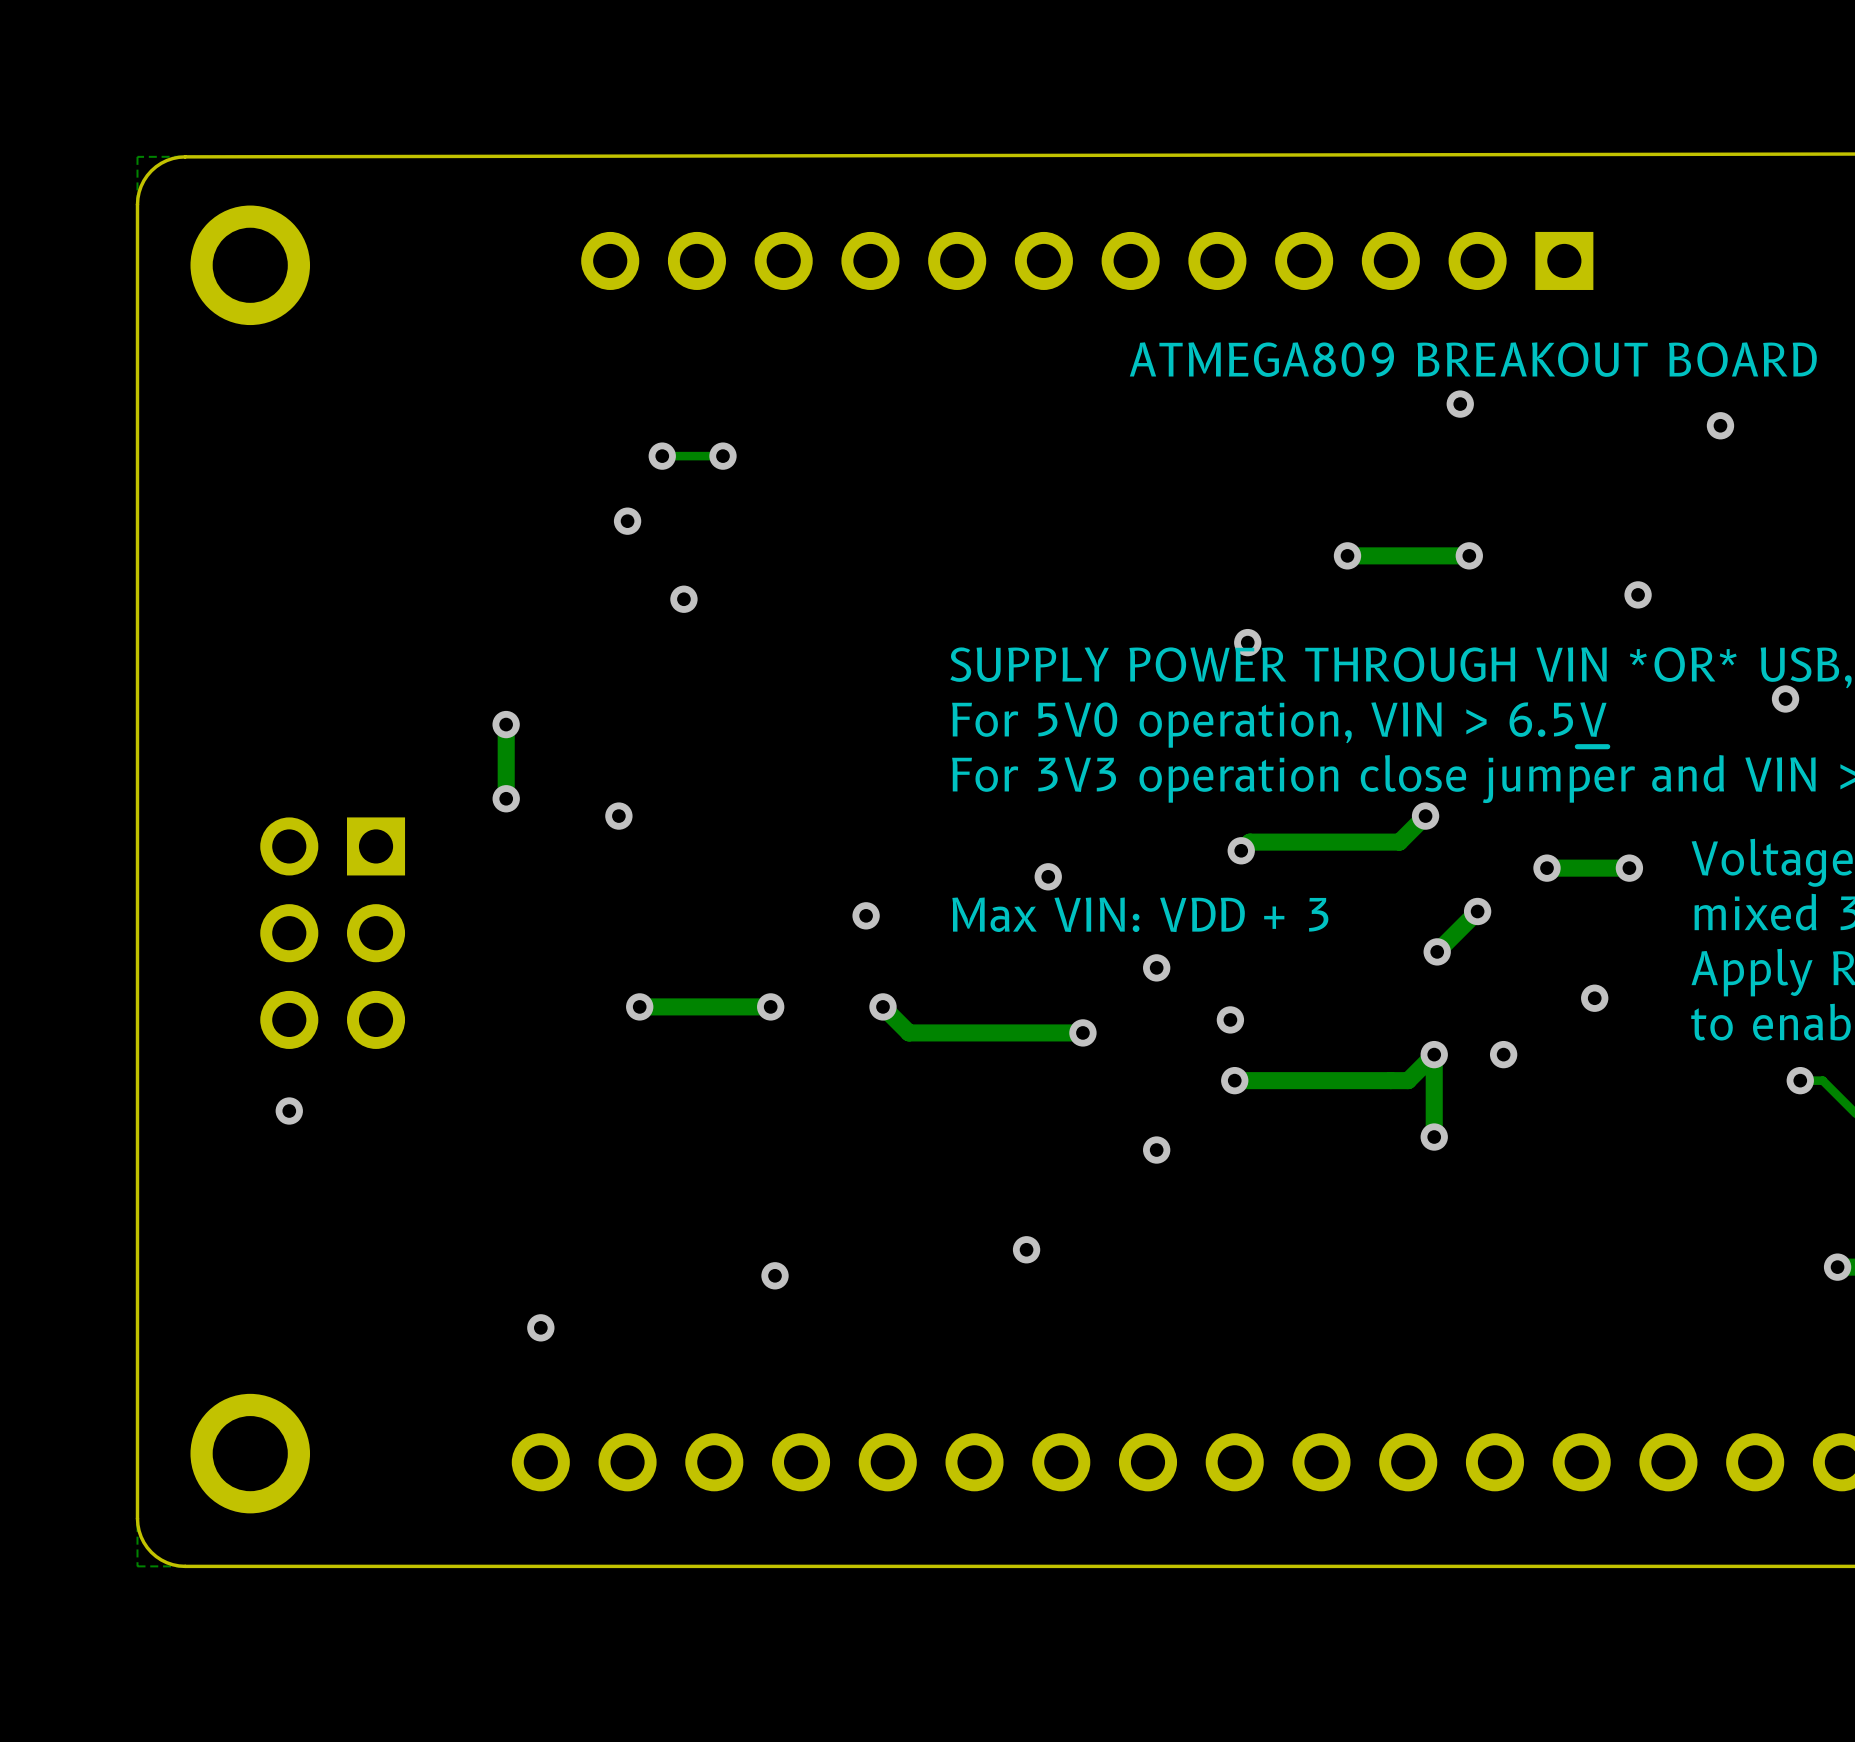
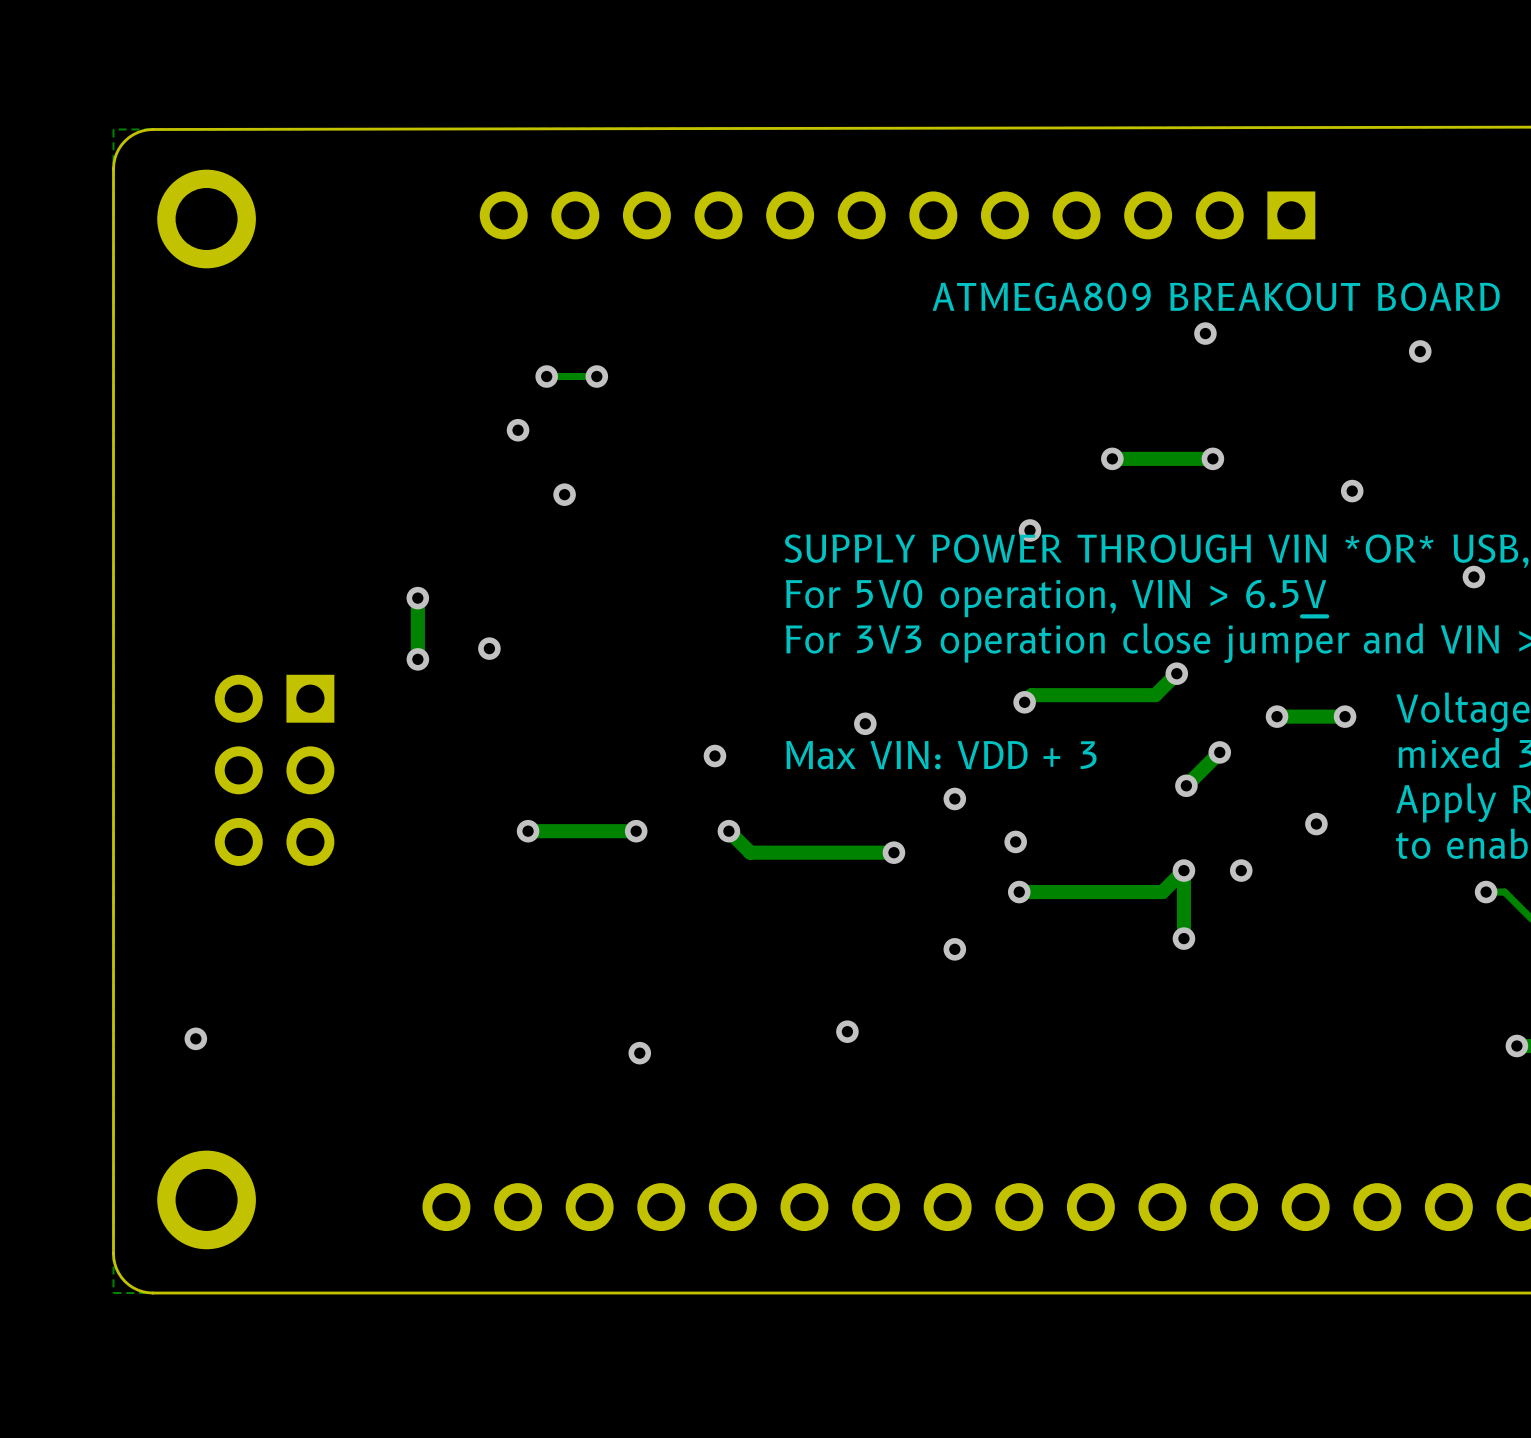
via position: (618, 816) -> (489, 648)
via: (289, 1111) -> none
via: none -> (195, 1038)
via: (540, 1327) -> none

